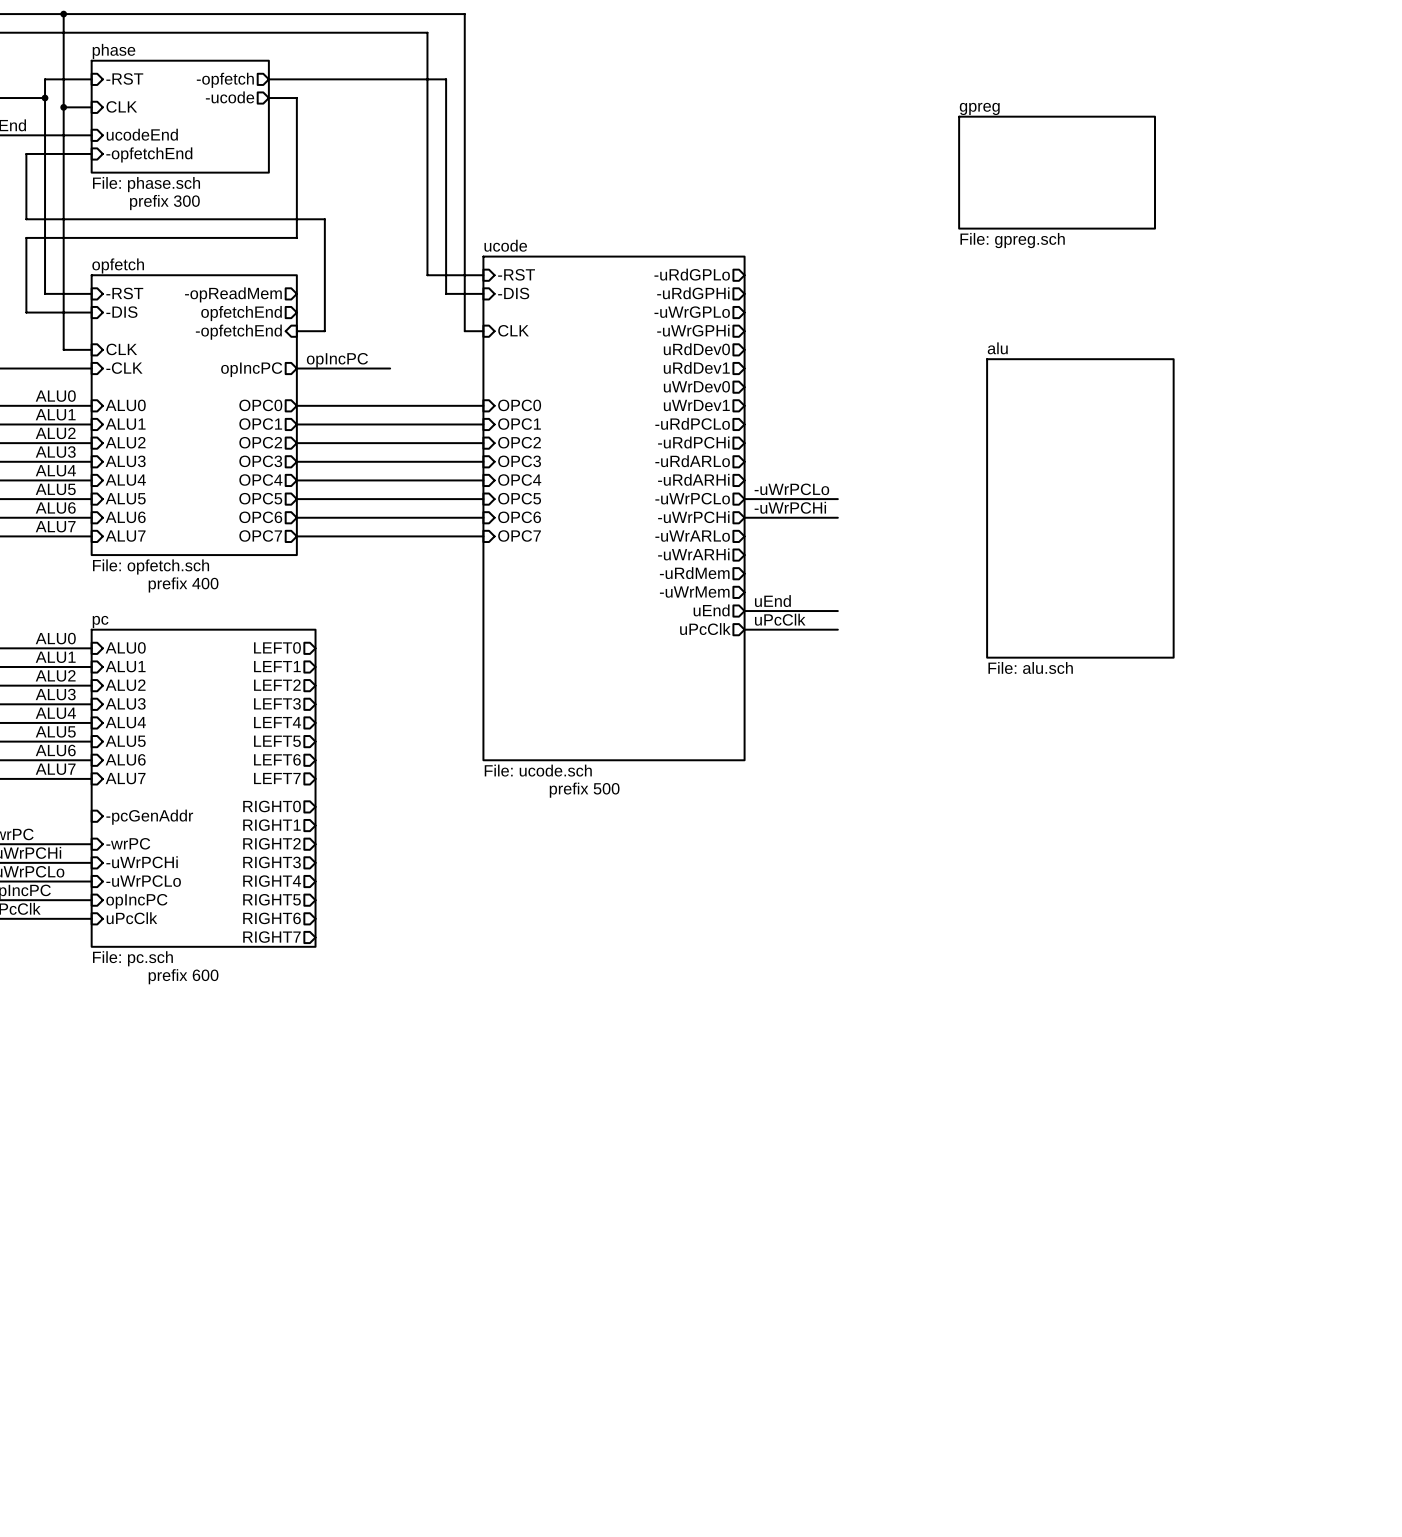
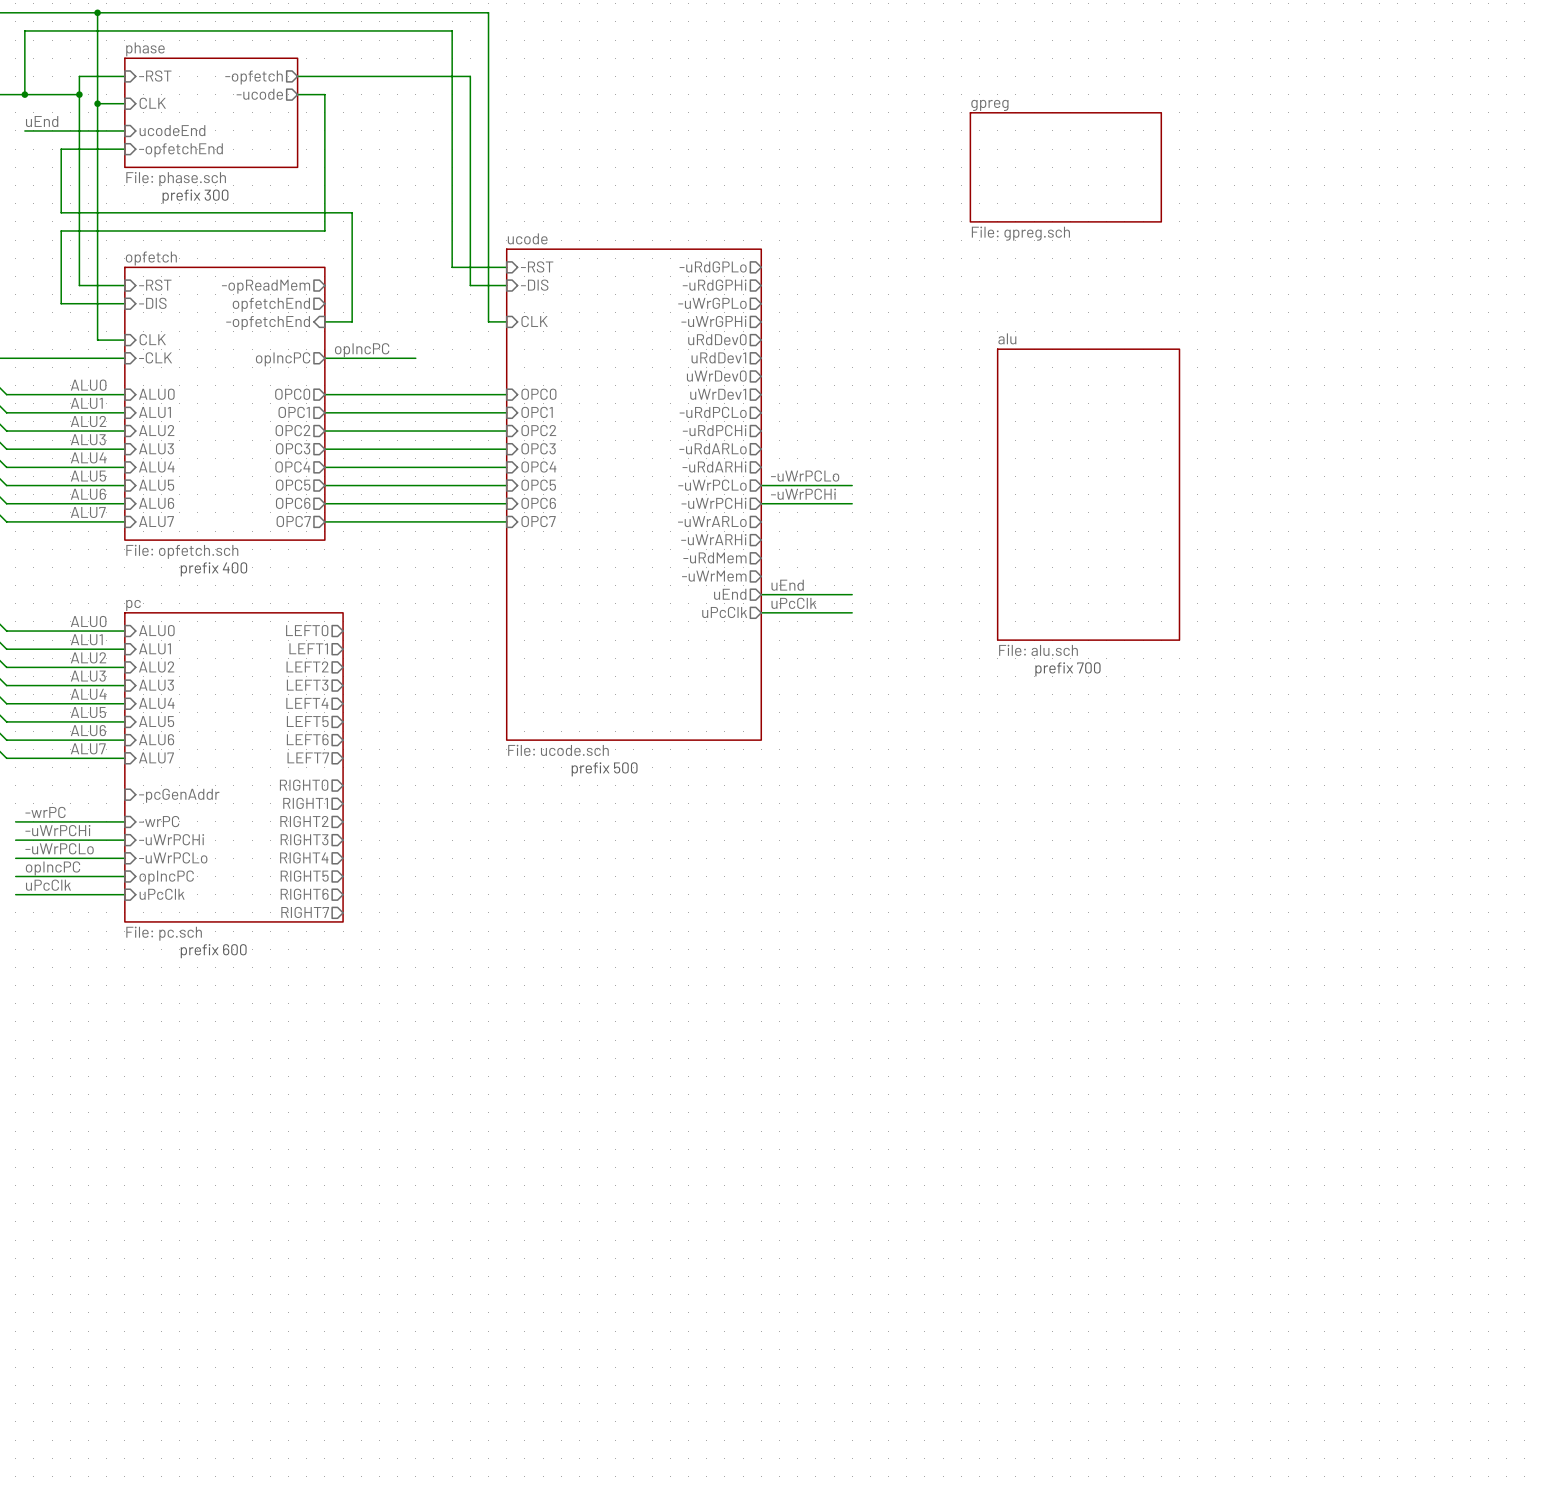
text: none -> prefix 700 (1067, 669)

